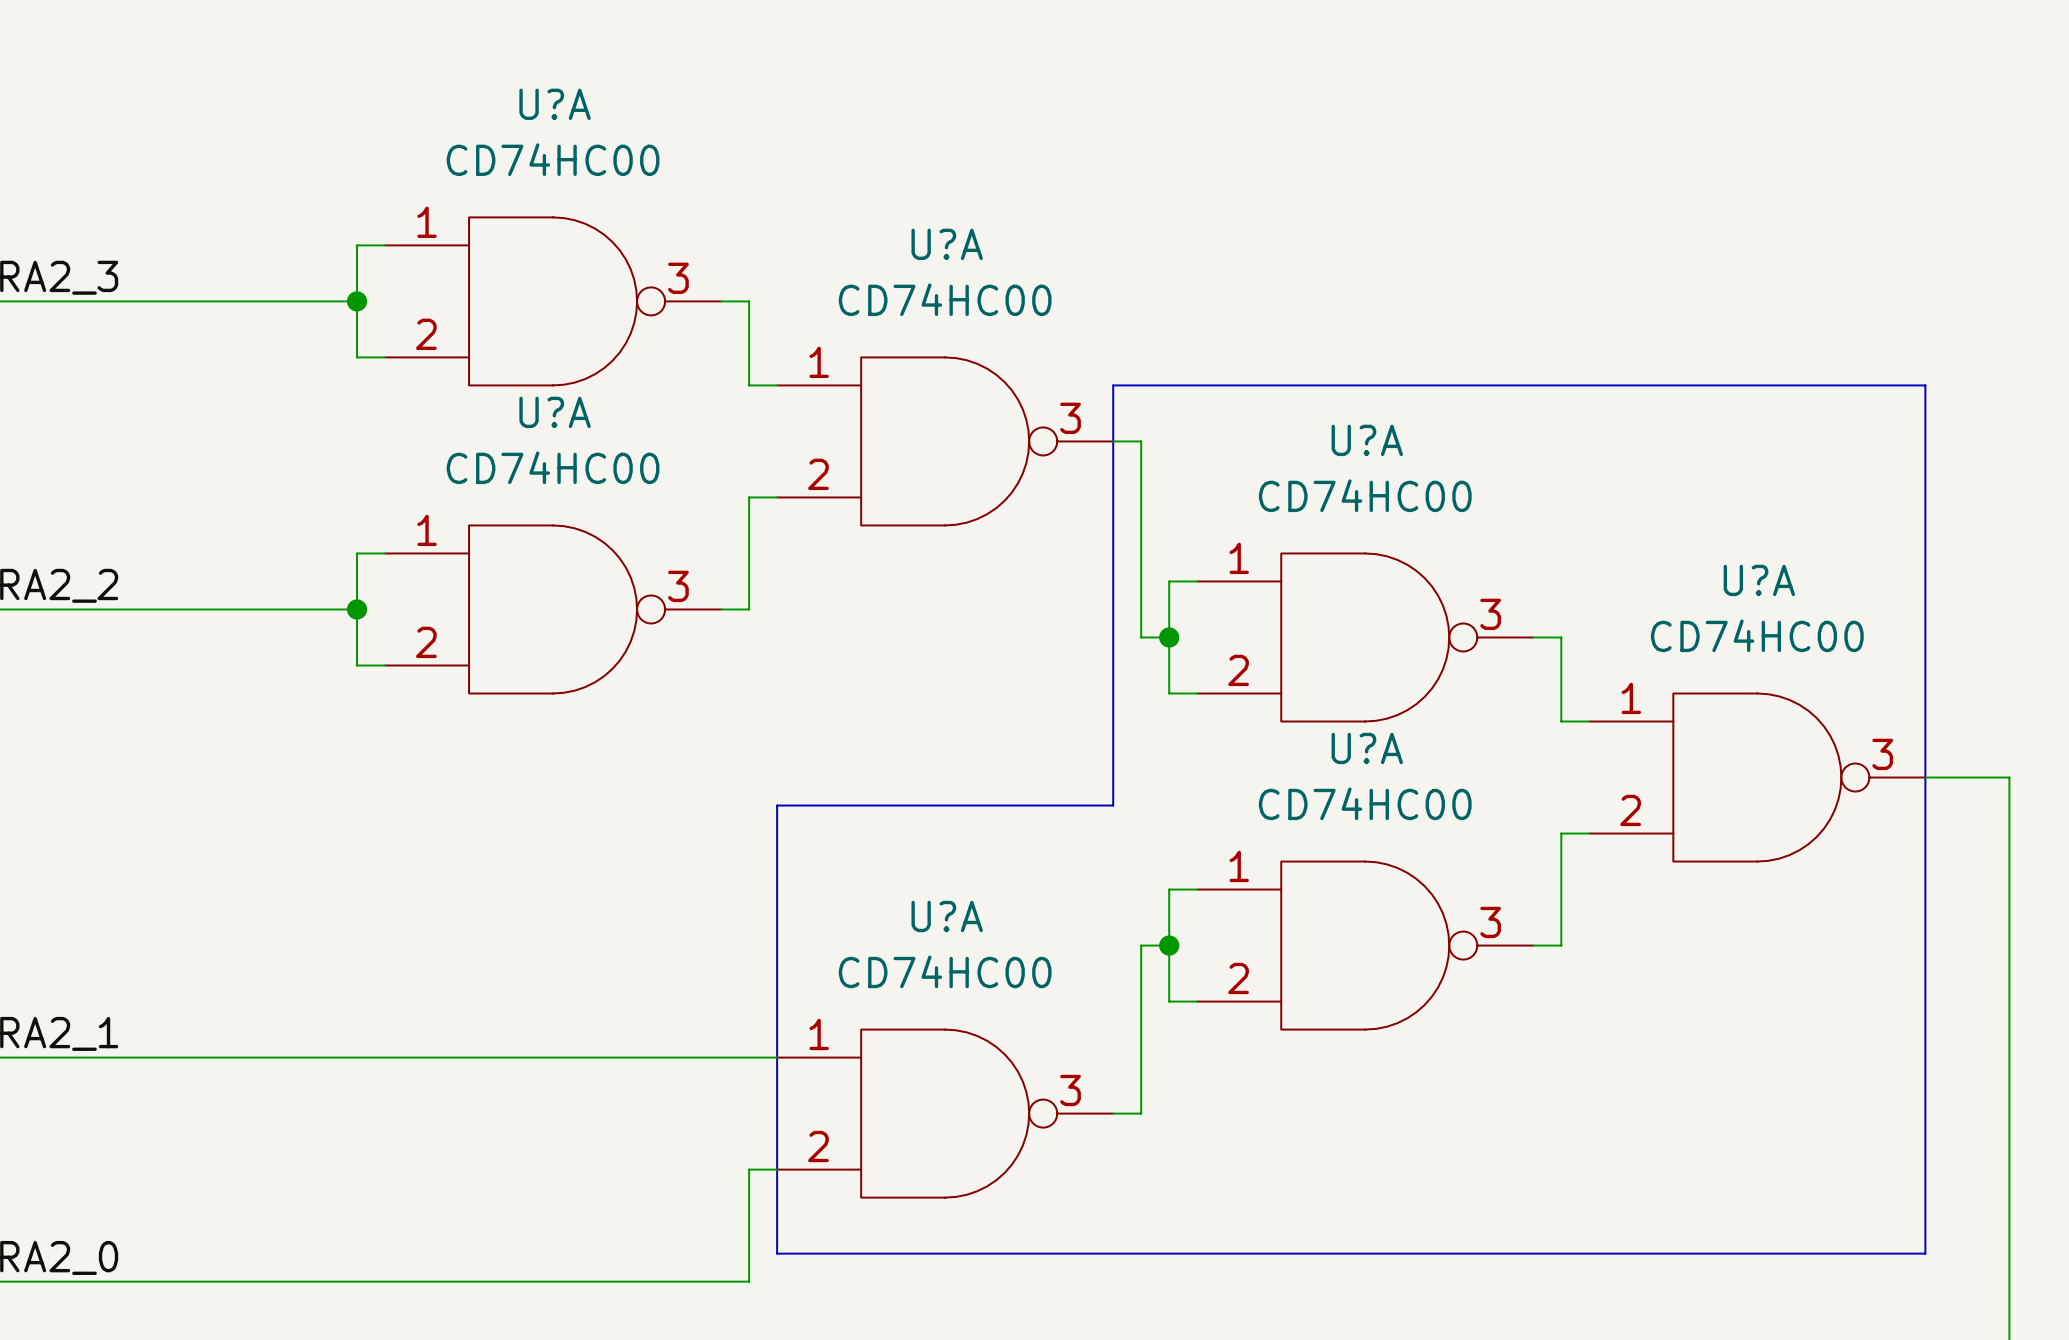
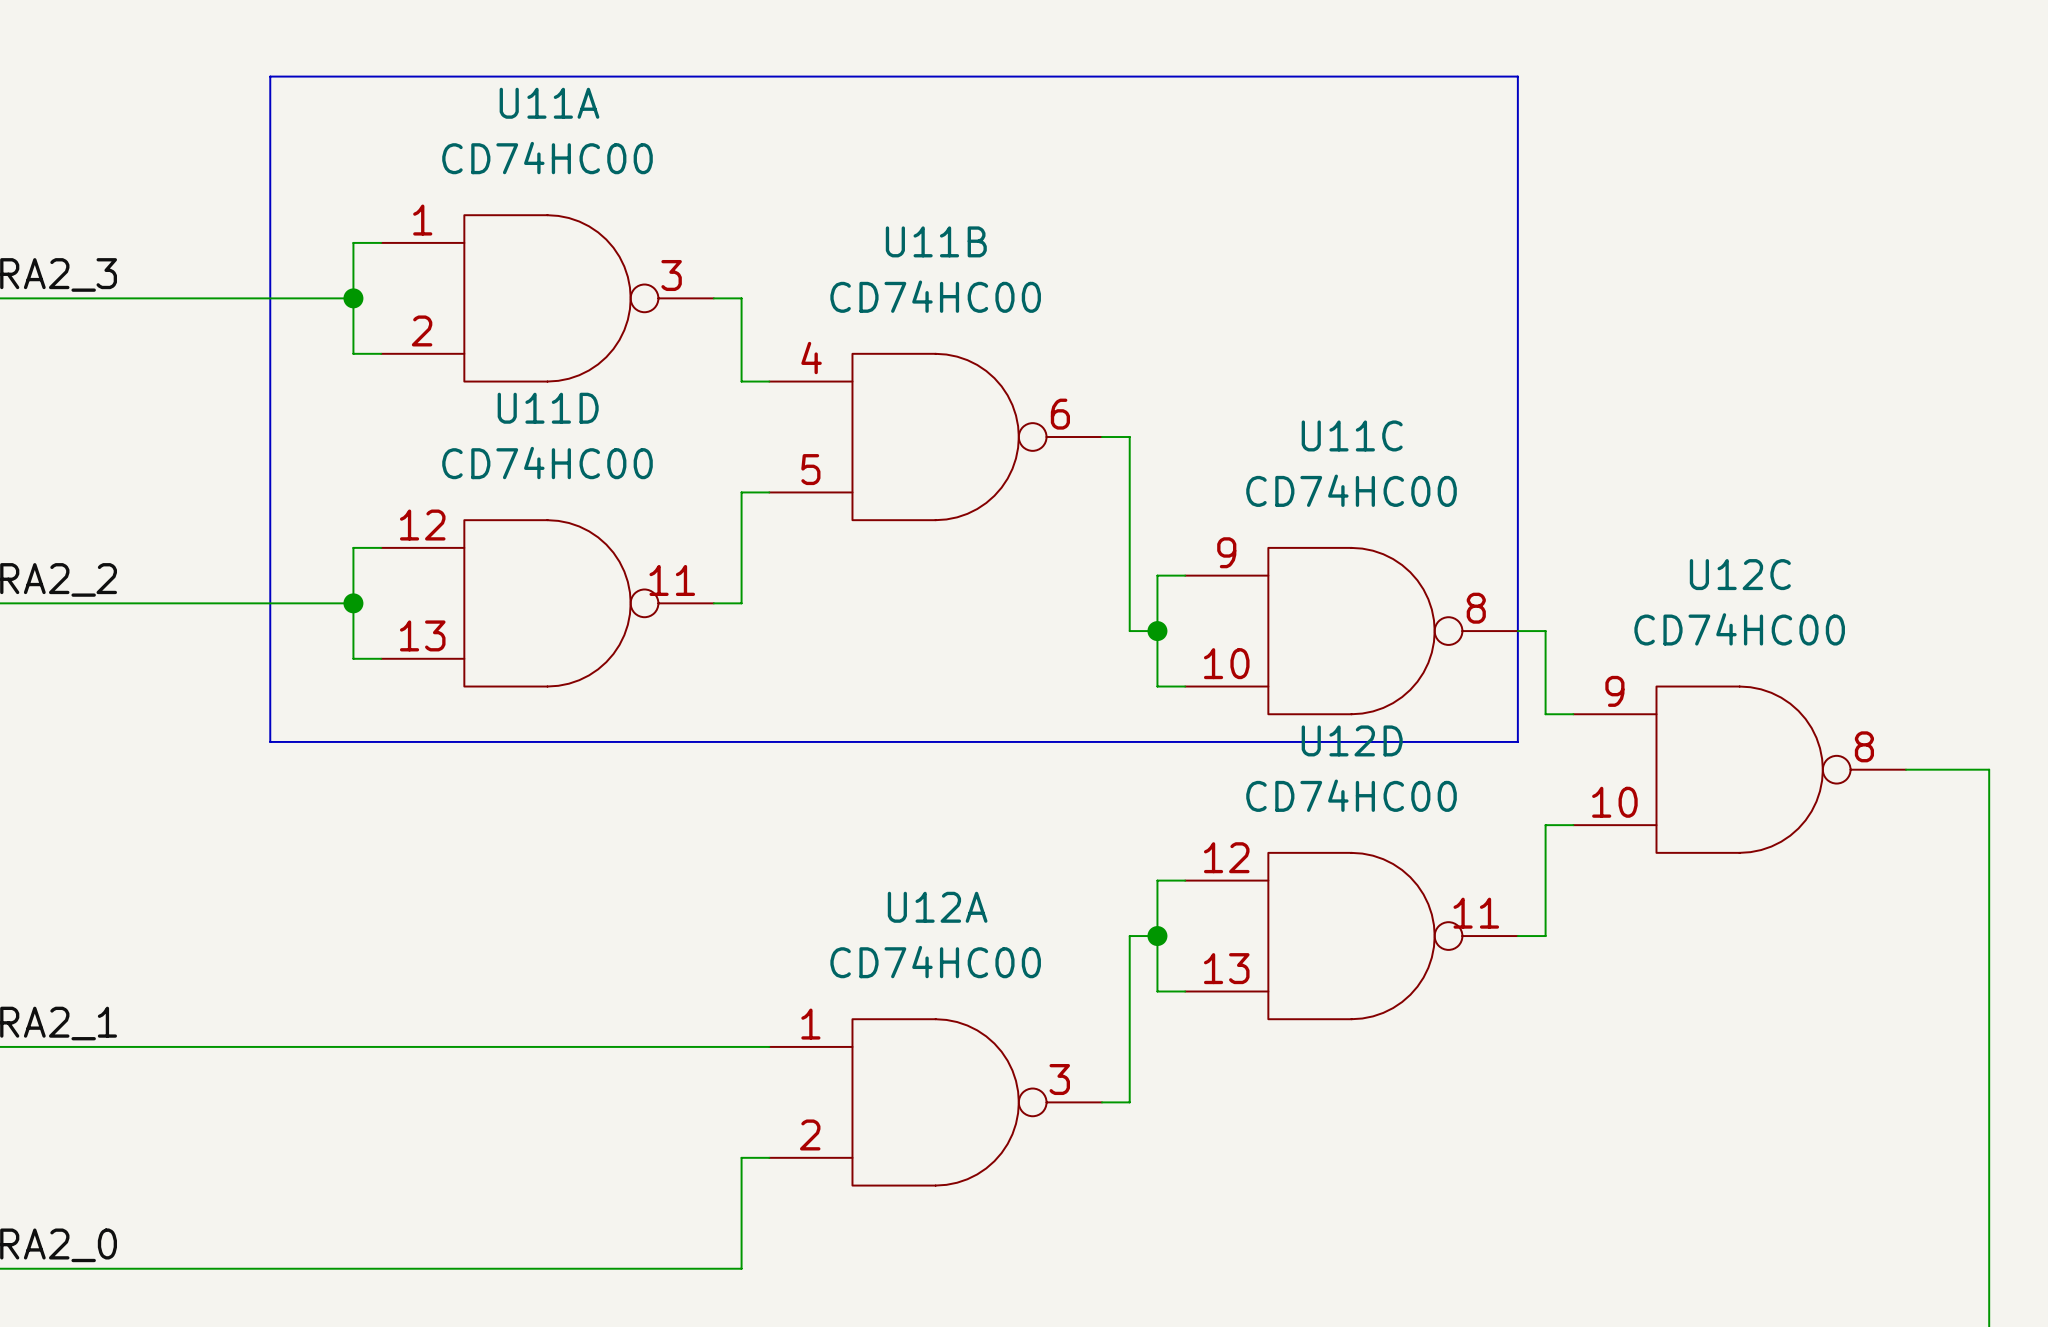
line: none -> (270, 76) (270, 741) (1517, 741) (1517, 76) (270, 76)
U?A name: U?A (555, 104) -> U11A (549, 103)
U?A name: U?A (947, 244) -> U11B (936, 241)
U?A pin number: 1 (819, 362) -> 4 (811, 358)
line: (1113, 385) (1925, 385) (1925, 1253) (777, 1253) (777, 805) (1113, 805) (1113, 385) -> none
U?A name: U?A (555, 412) -> U11D (548, 408)
U?A pin number: 3 (1070, 418) -> 6 (1060, 414)
U?A name: U?A (1367, 440) -> U11C (1352, 435)
U?A pin number: 2 (818, 474) -> 5 (810, 469)
U?A pin number: 1 (427, 530) -> 12 (422, 525)
U?A pin number: 1 (1239, 558) -> 9 (1226, 552)
U?A name: U?A (1759, 580) -> U12C (1740, 574)
U?A pin number: 3 (678, 586) -> 11 (672, 580)
U?A pin number: 3 (1490, 614) -> 8 (1476, 608)
U?A pin number: 2 (426, 642) -> 13 (422, 635)
U?A pin number: 2 (1238, 670) -> 10 (1226, 663)
U?A pin number: 1 (1631, 698) -> 9 (1614, 691)
U?A name: U?A (1367, 748) -> U12D (1352, 740)
U?A pin number: 3 (1882, 754) -> 8 (1864, 746)
U?A pin number: 2 (1630, 810) -> 10 (1614, 802)
U?A pin number: 1 (1239, 866) -> 12 (1226, 857)
U?A name: U?A (947, 916) -> U12A (937, 907)
U?A pin number: 3 (1490, 922) -> 11 (1476, 913)
U?A pin number: 2 (1238, 978) -> 13 (1226, 968)

